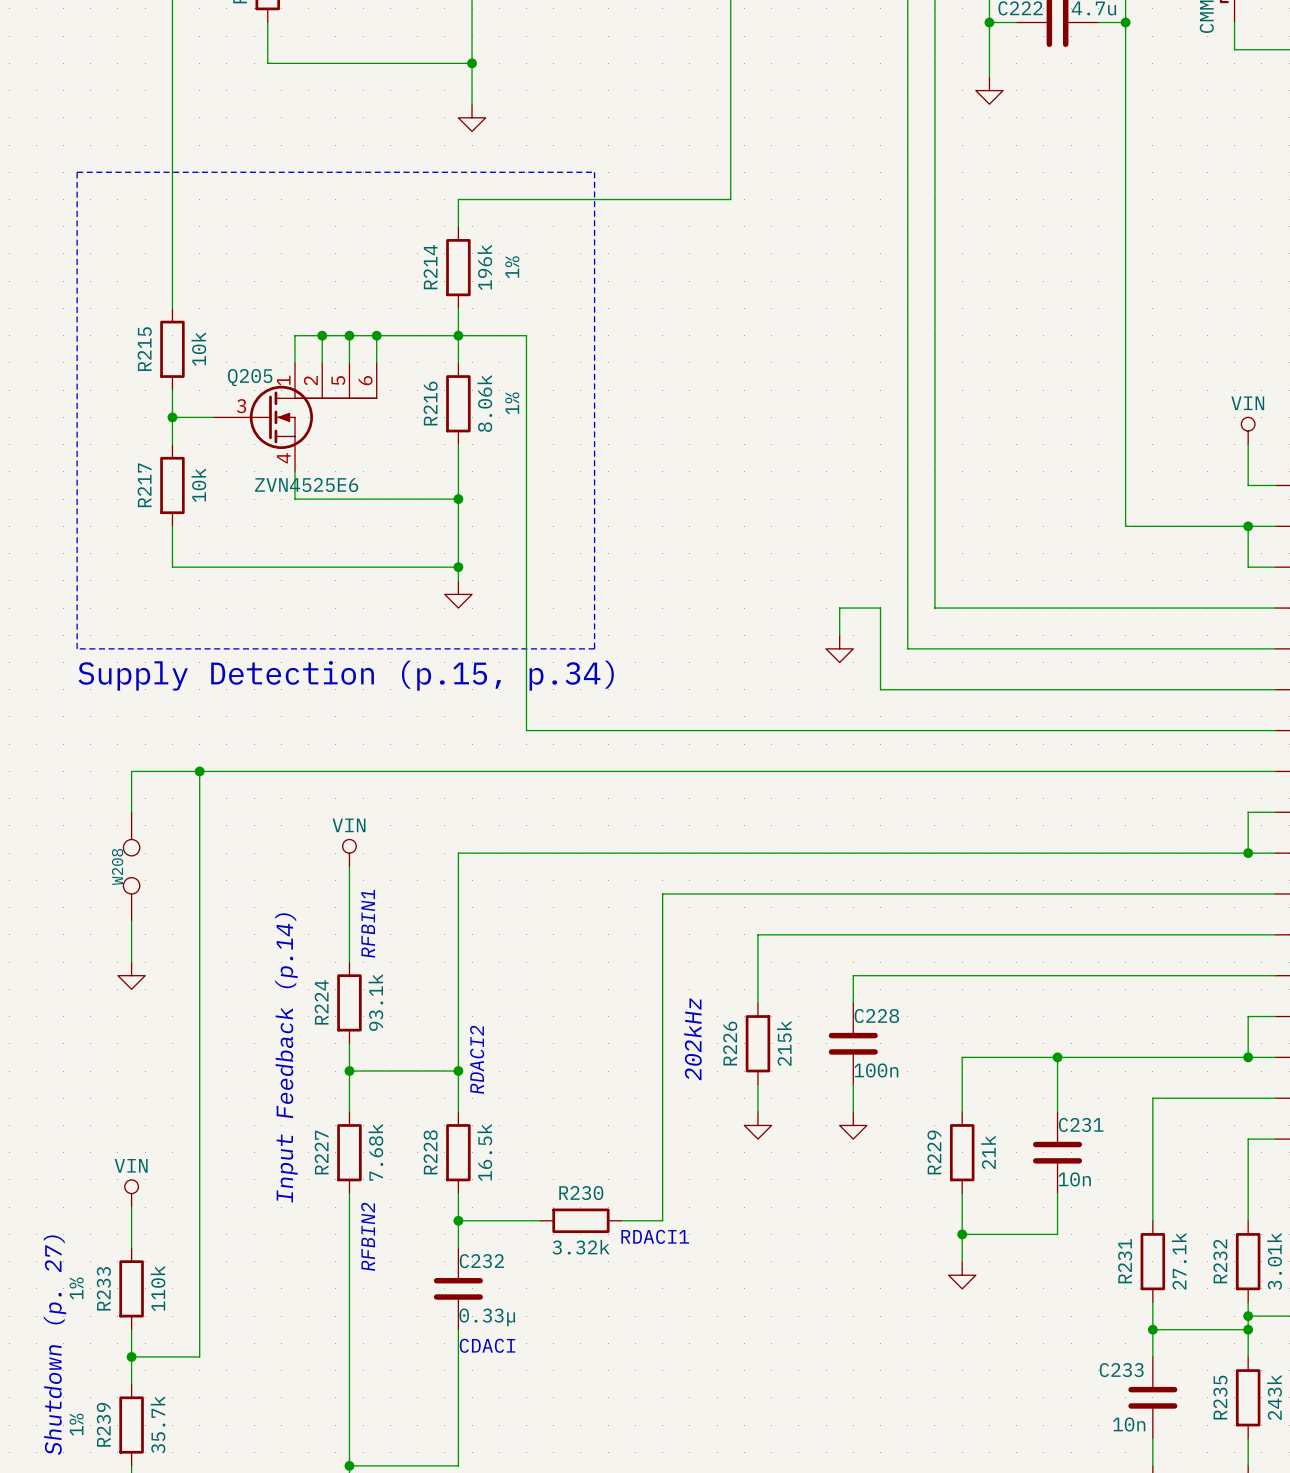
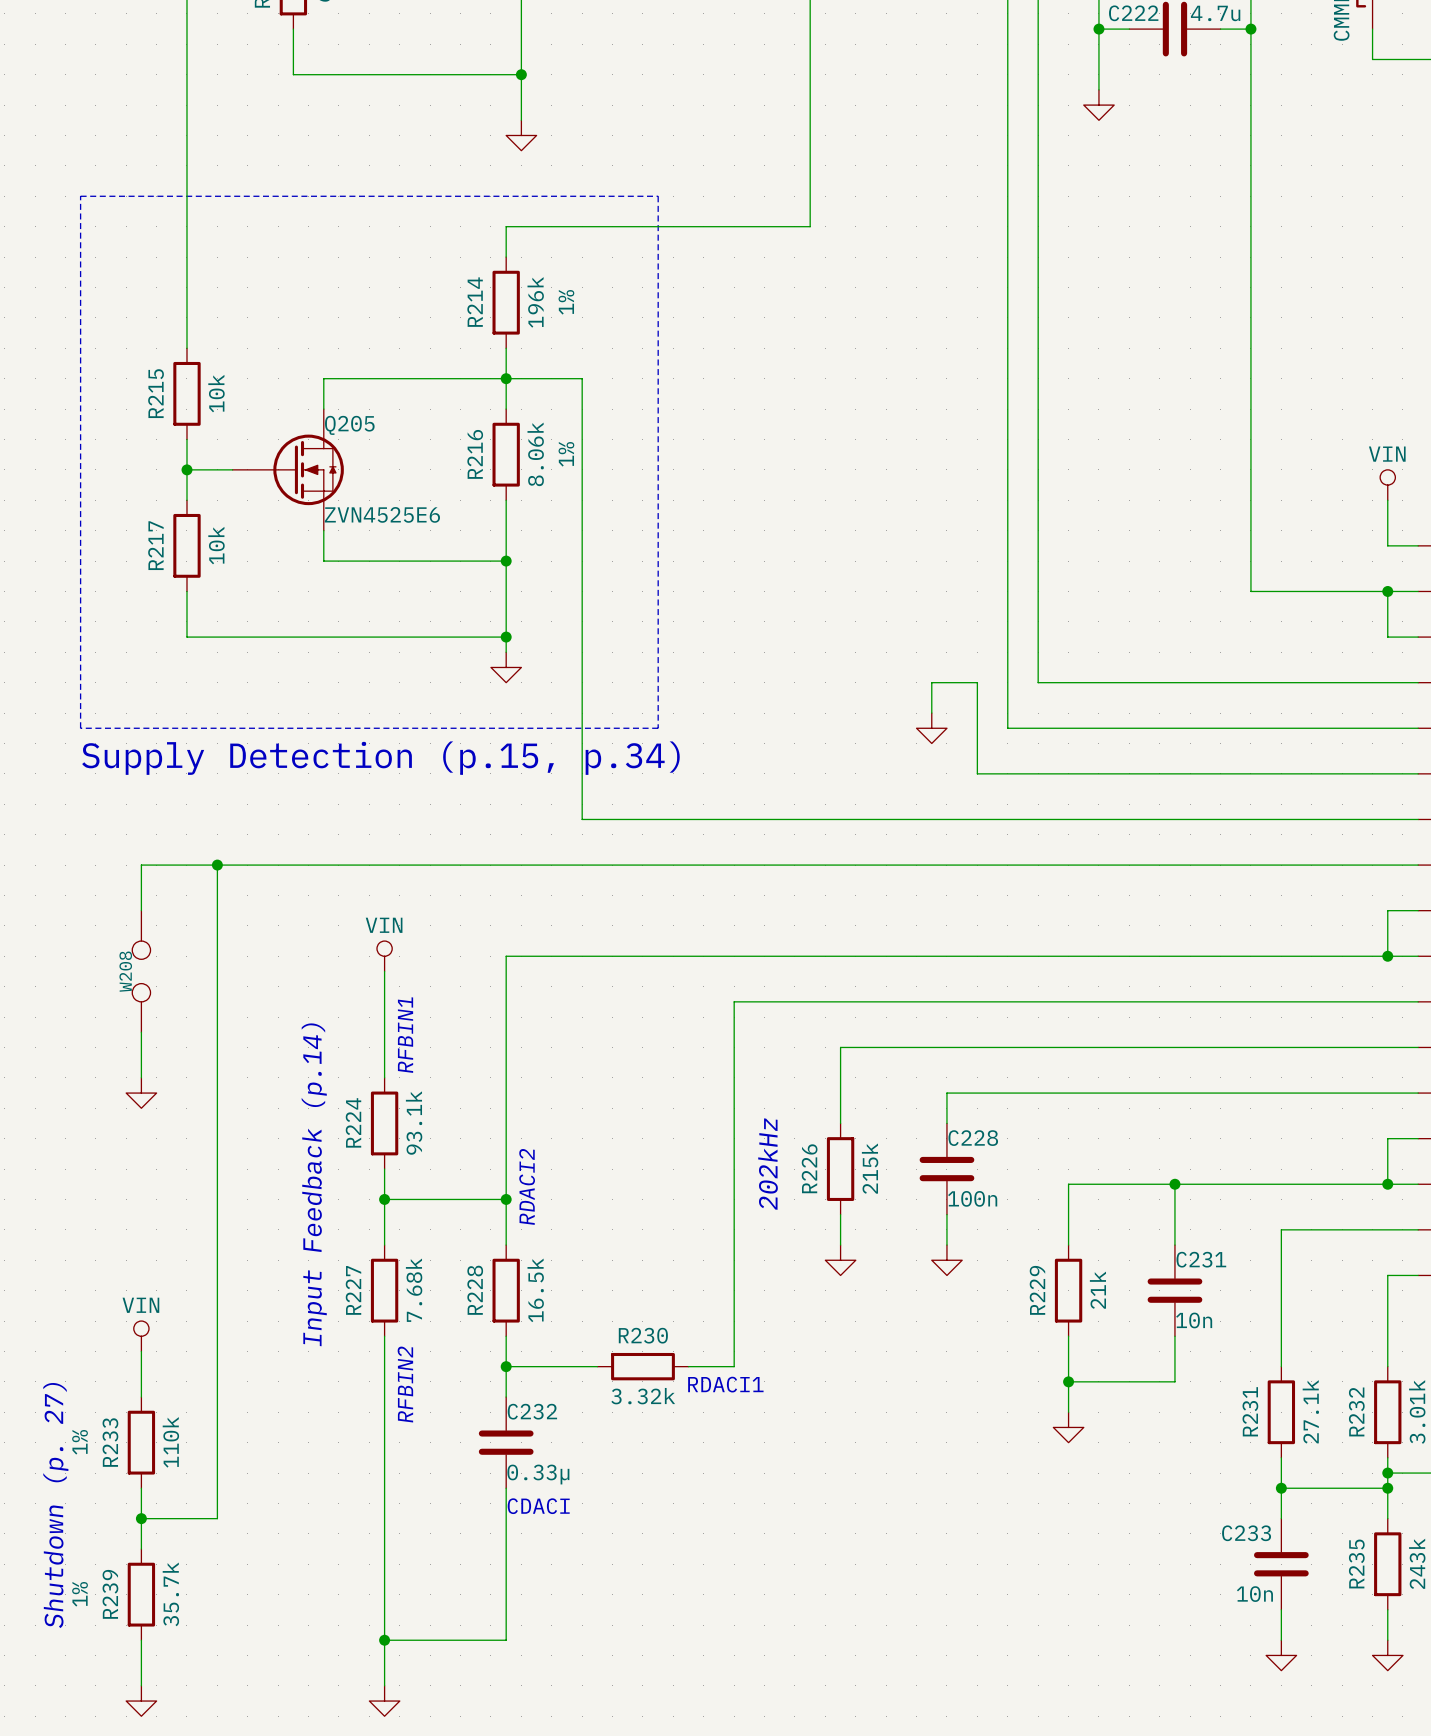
wire: (322, 335) (322, 362) -> none
junction: (322, 335) -> none
wire: (349, 335) (349, 362) -> none
junction: (349, 335) -> none
wire: (376, 335) (376, 362) -> none
junction: (376, 335) -> none
Q205 symbol: [213, 362, 377, 472] -> [232, 409, 344, 531]
Q205 name position: Q205 (250, 377) -> Q205 (349, 425)
Q205 value position: ZVN4525E6 (306, 484) -> ZVN4525E6 (382, 514)

